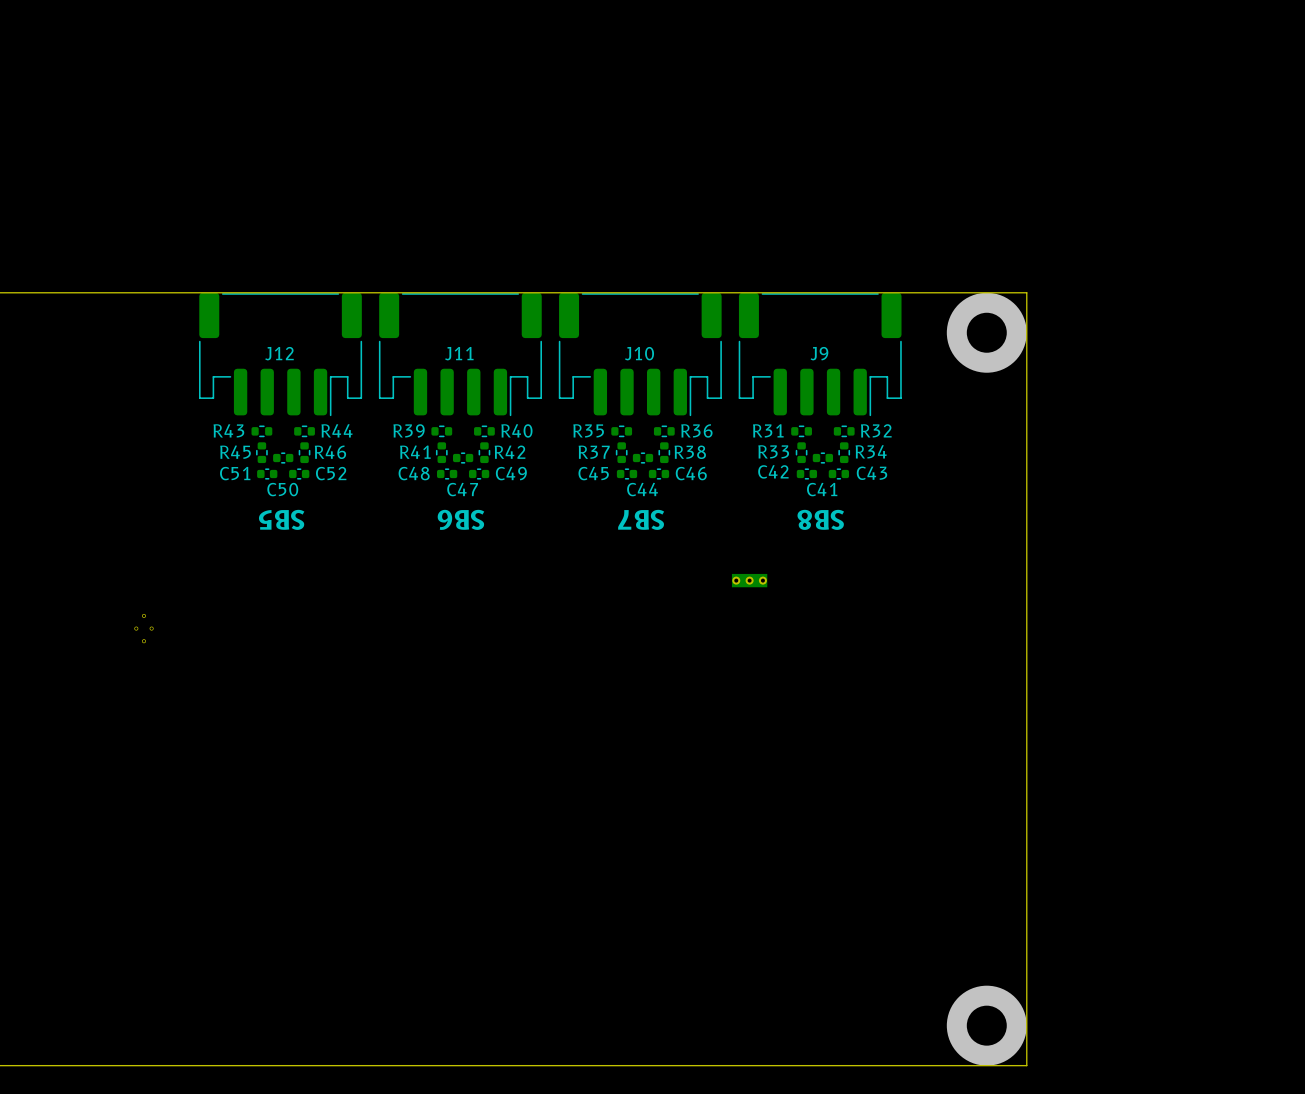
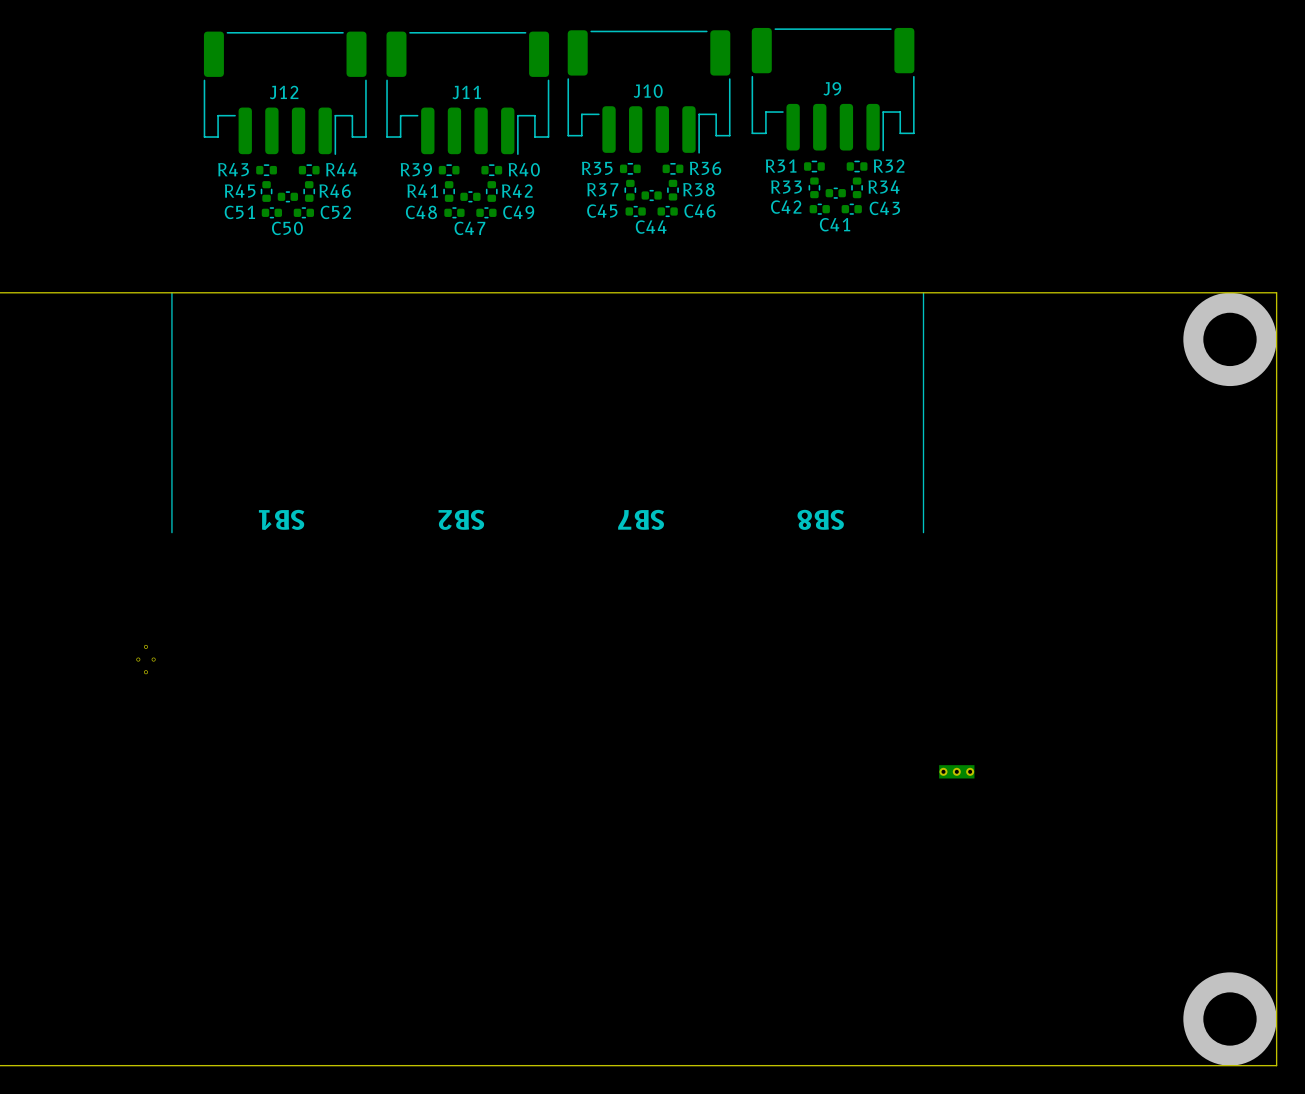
line: none -> (171, 292) (171, 532)
line: none -> (923, 292) (923, 532)
board edge: (1026, 292) (1026, 1065) -> (1026, 292) (1276, 292) (1276, 1065) (1026, 1065)
via: (986, 332) -> none
via: none -> (1229, 339)
J12 position: (280, 354) -> (285, 93)
J11 position: (460, 354) -> (467, 93)
J10 position: (640, 354) -> (649, 91)
J9 position: (820, 354) -> (833, 89)
R43 position: (261, 431) -> (266, 170)
R44 position: (304, 431) -> (309, 170)
R39 position: (441, 431) -> (449, 170)
R40 position: (484, 431) -> (491, 170)
R35 position: (621, 431) -> (630, 168)
R36 position: (664, 431) -> (672, 168)
R31 position: (801, 431) -> (814, 166)
R32 position: (844, 431) -> (857, 166)
R45 position: (261, 452) -> (266, 191)
R46 position: (304, 452) -> (309, 191)
R41 position: (441, 452) -> (449, 191)
R42 position: (484, 452) -> (491, 191)
R37 position: (621, 452) -> (630, 190)
R38 position: (664, 452) -> (672, 190)
R33 position: (801, 452) -> (814, 187)
R34 position: (844, 452) -> (857, 187)
C50 position: (283, 458) -> (287, 196)
C47 position: (463, 458) -> (470, 196)
C44 position: (643, 458) -> (651, 195)
C41 position: (822, 458) -> (835, 193)
C51 position: (267, 474) -> (271, 212)
C52 position: (299, 474) -> (303, 212)
C48 position: (447, 474) -> (454, 212)
C49 position: (479, 474) -> (486, 212)
C45 position: (627, 474) -> (635, 211)
C46 position: (658, 474) -> (667, 211)
C42 position: (806, 474) -> (819, 209)
C43 position: (838, 474) -> (851, 209)
text: SB5 (281, 519) -> SB1 (281, 519)
text: SB6 (460, 519) -> SB2 (461, 519)
part position: (749, 580) -> (956, 771)
part position: (143, 628) -> (145, 659)
via: none -> (1229, 1019)
via: (986, 1025) -> none

